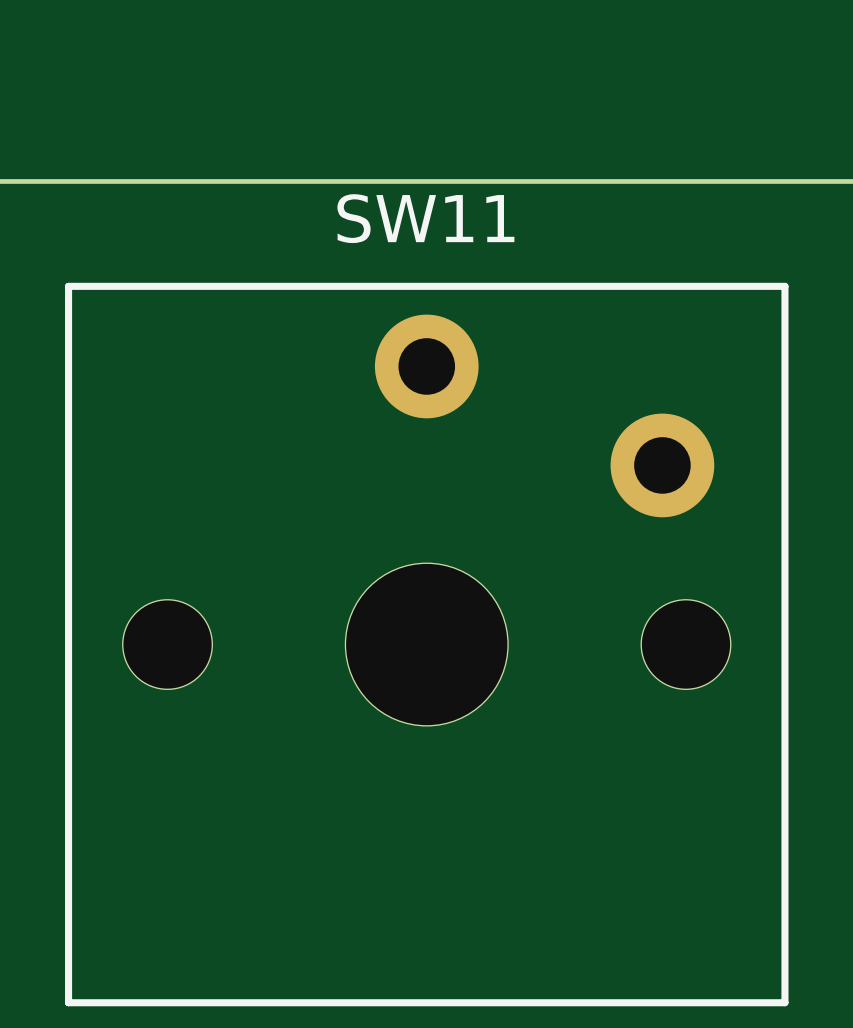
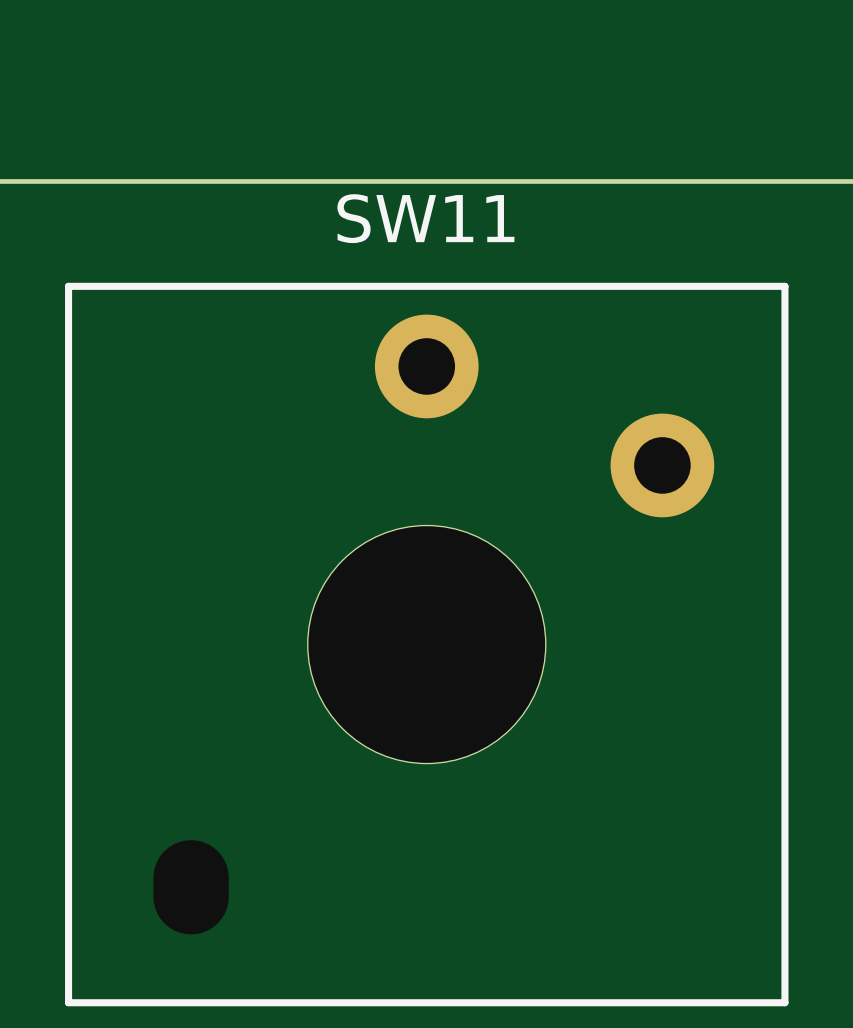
SW11 footprint: [65, 282, 789, 1007] -> [65, 282, 789, 1007]

